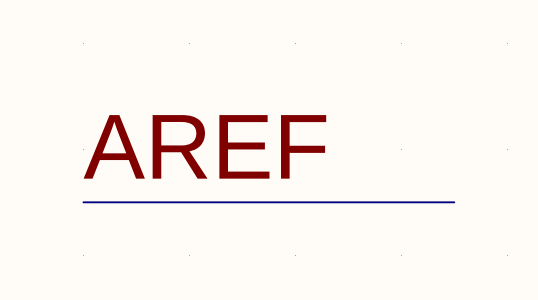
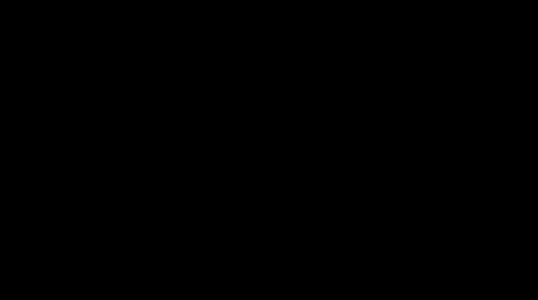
label: AREF (204, 146) -> none
wire: (83, 202) (454, 202) -> none

